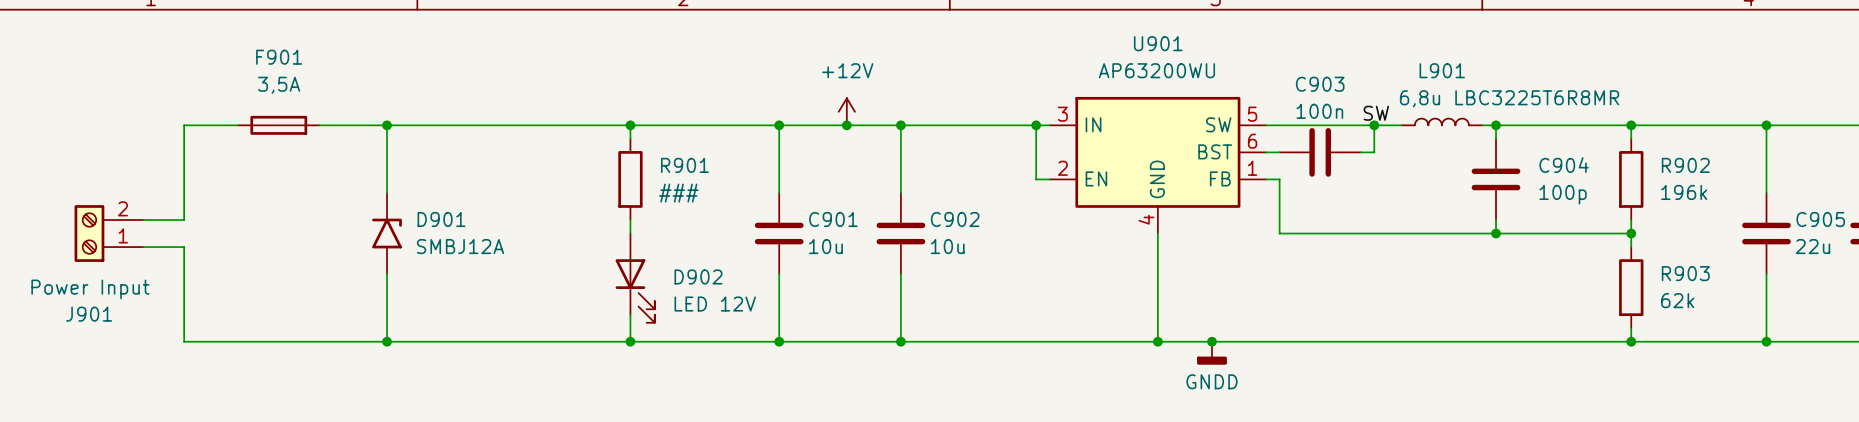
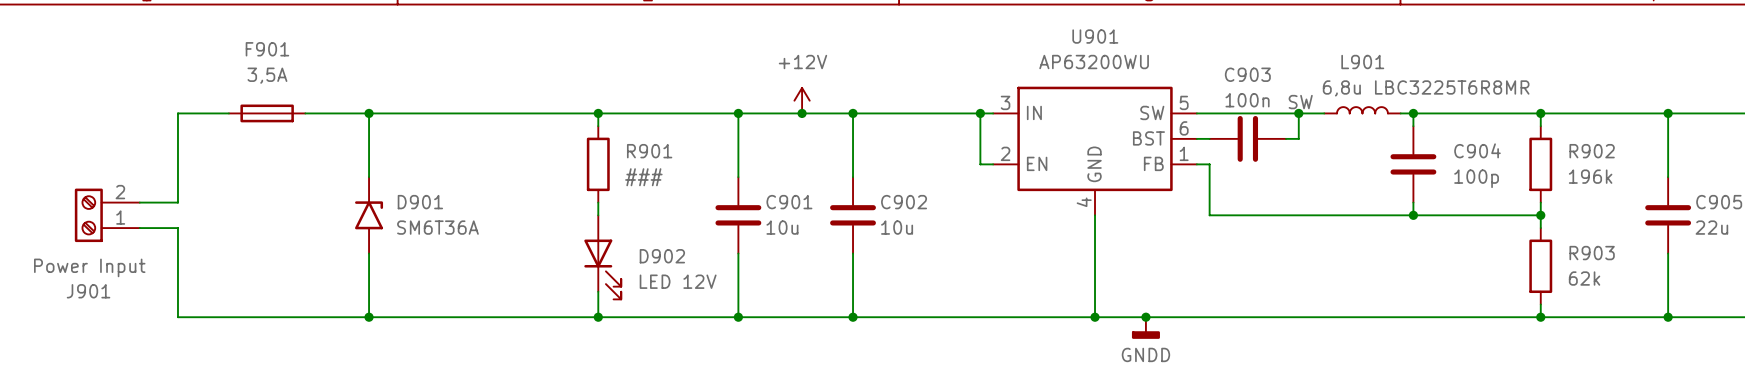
D901 value: SMBJ12A (460, 246) -> SM6T36A (437, 227)

